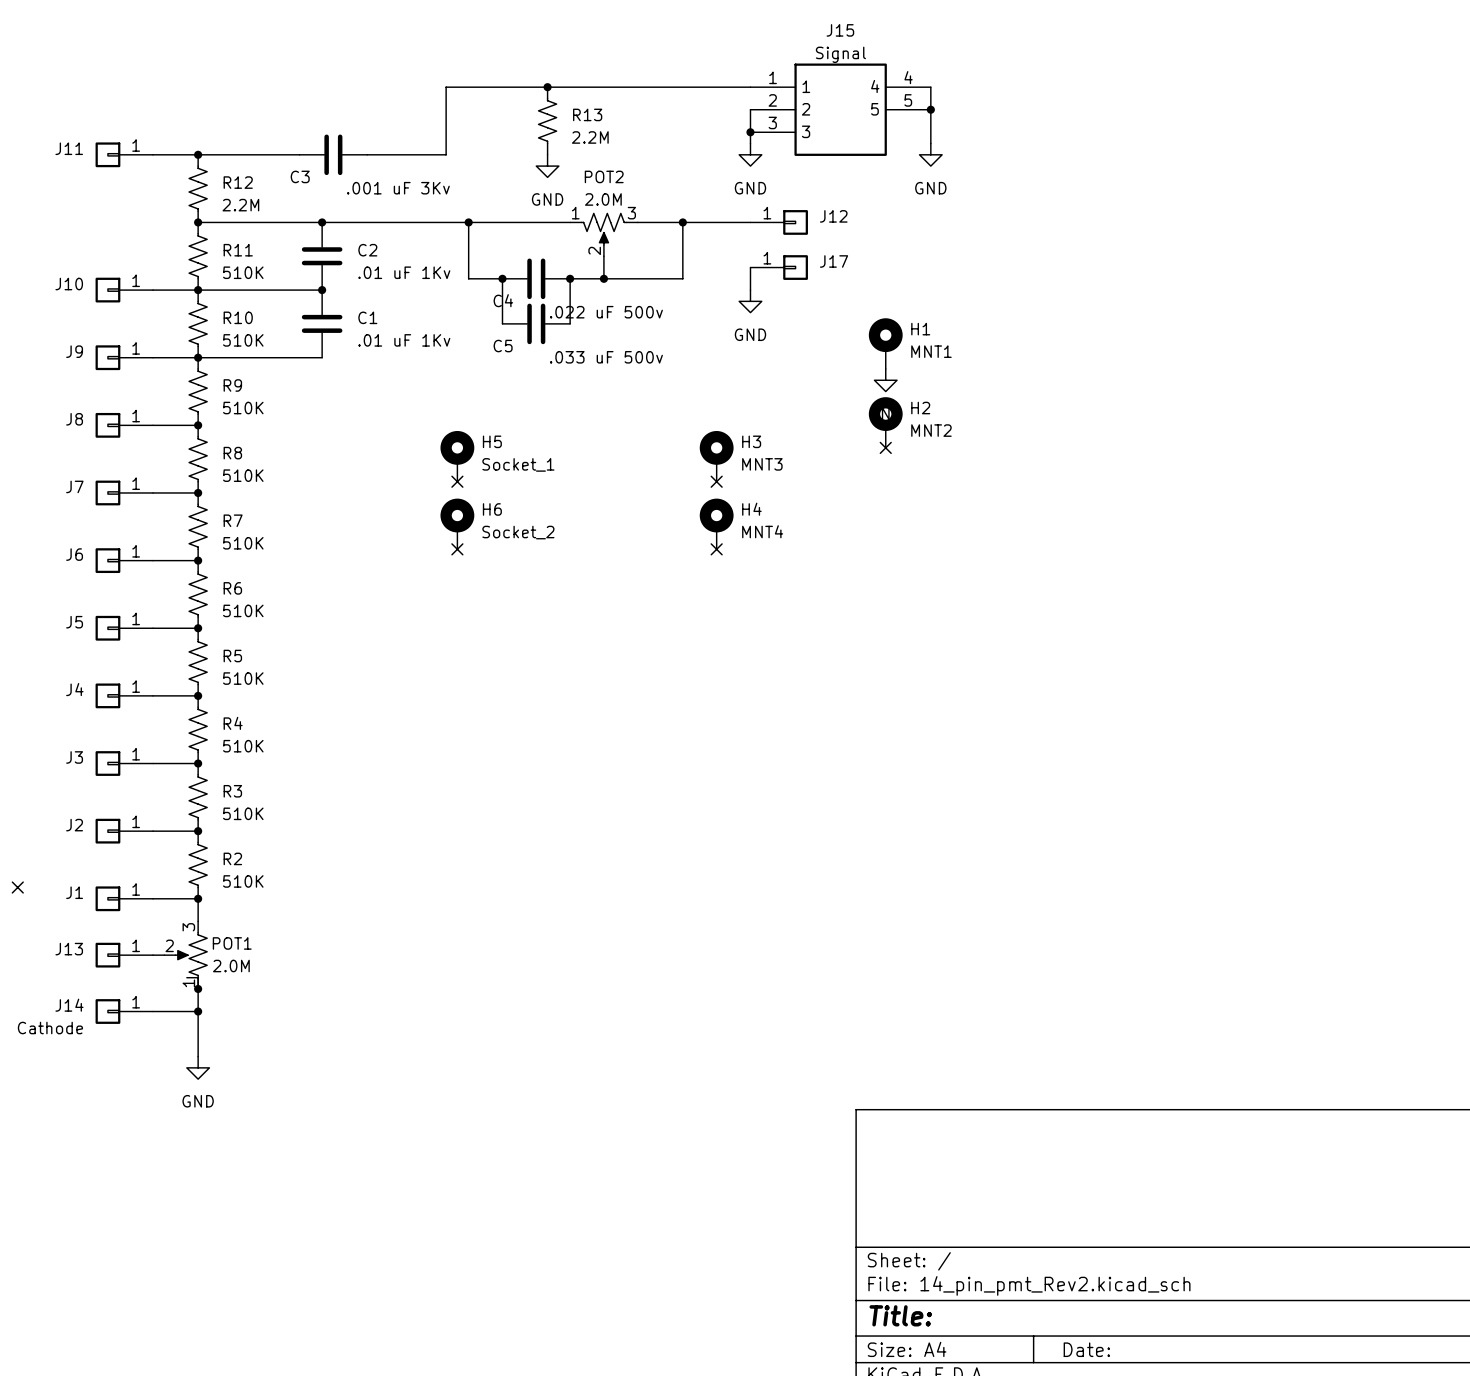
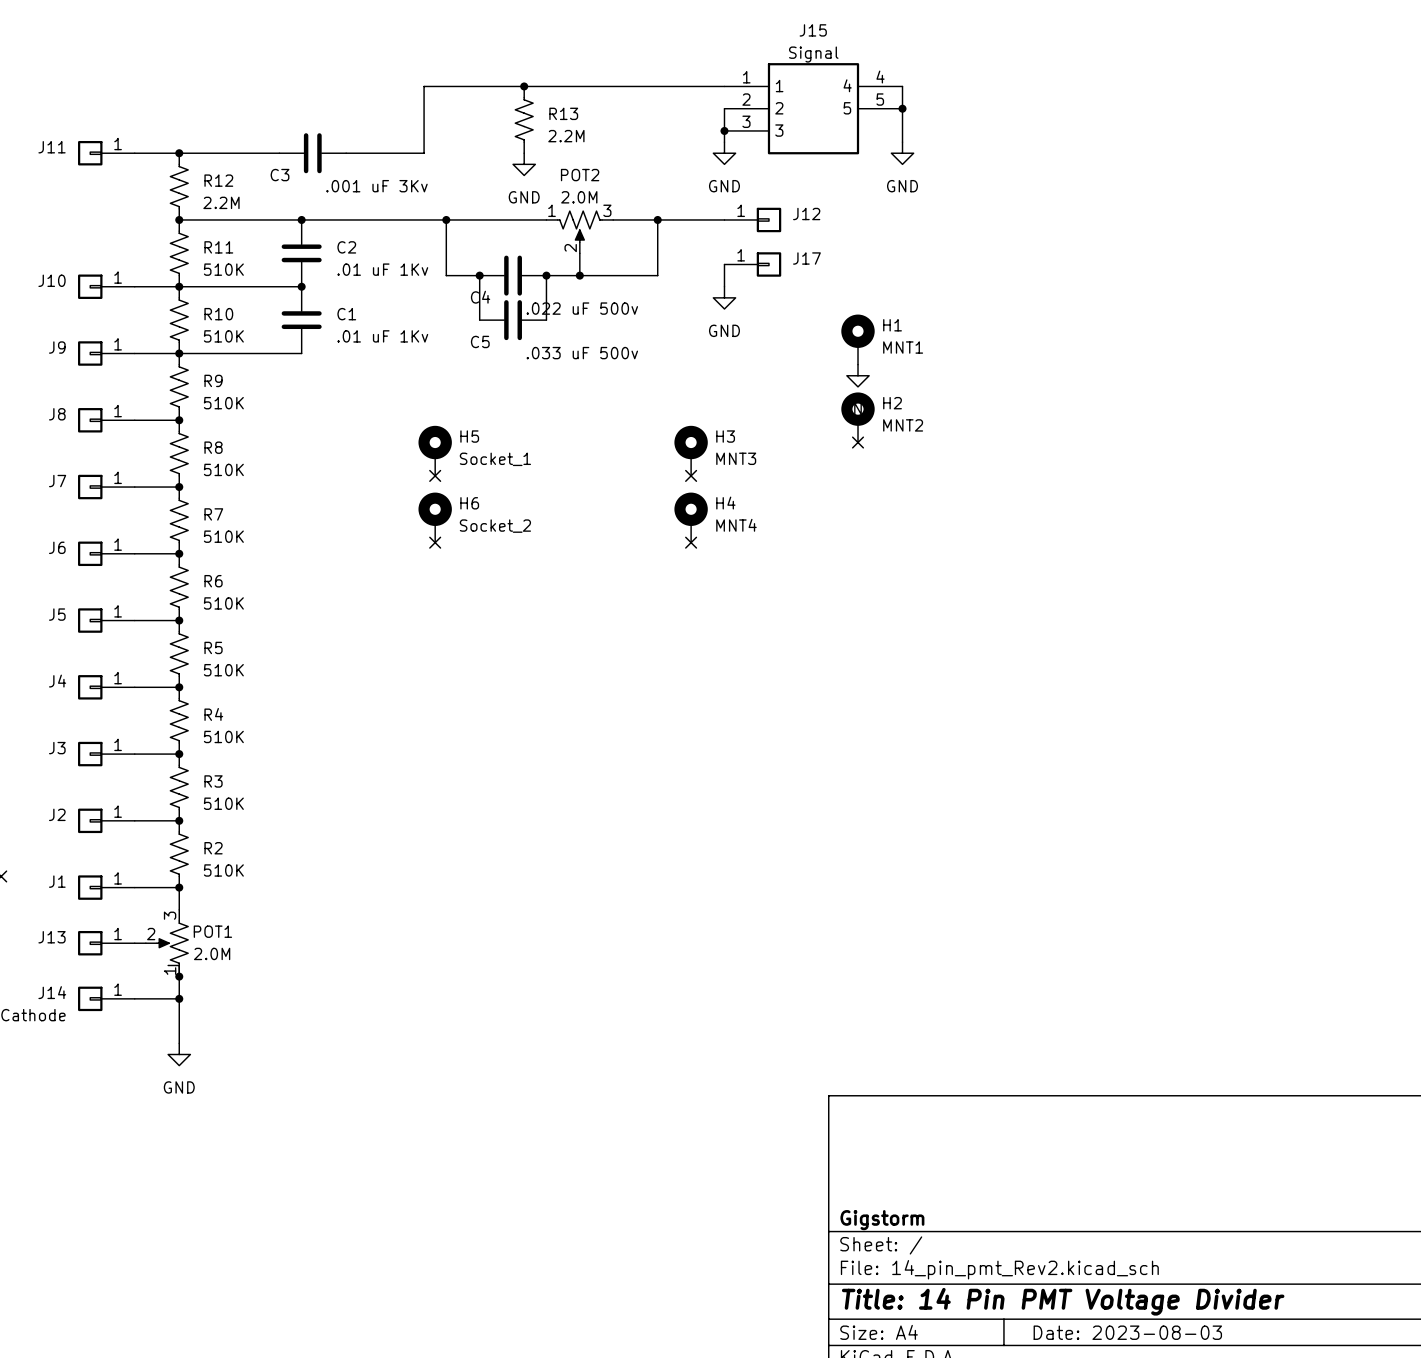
title block: none -> Gigstorm (882, 1220)
title block: Title: (900, 1315) -> Title: 14 Pin PMT Voltage Divider (1063, 1301)
title block: Date: (1086, 1349) -> Date: 2023-08-03 (1127, 1332)

